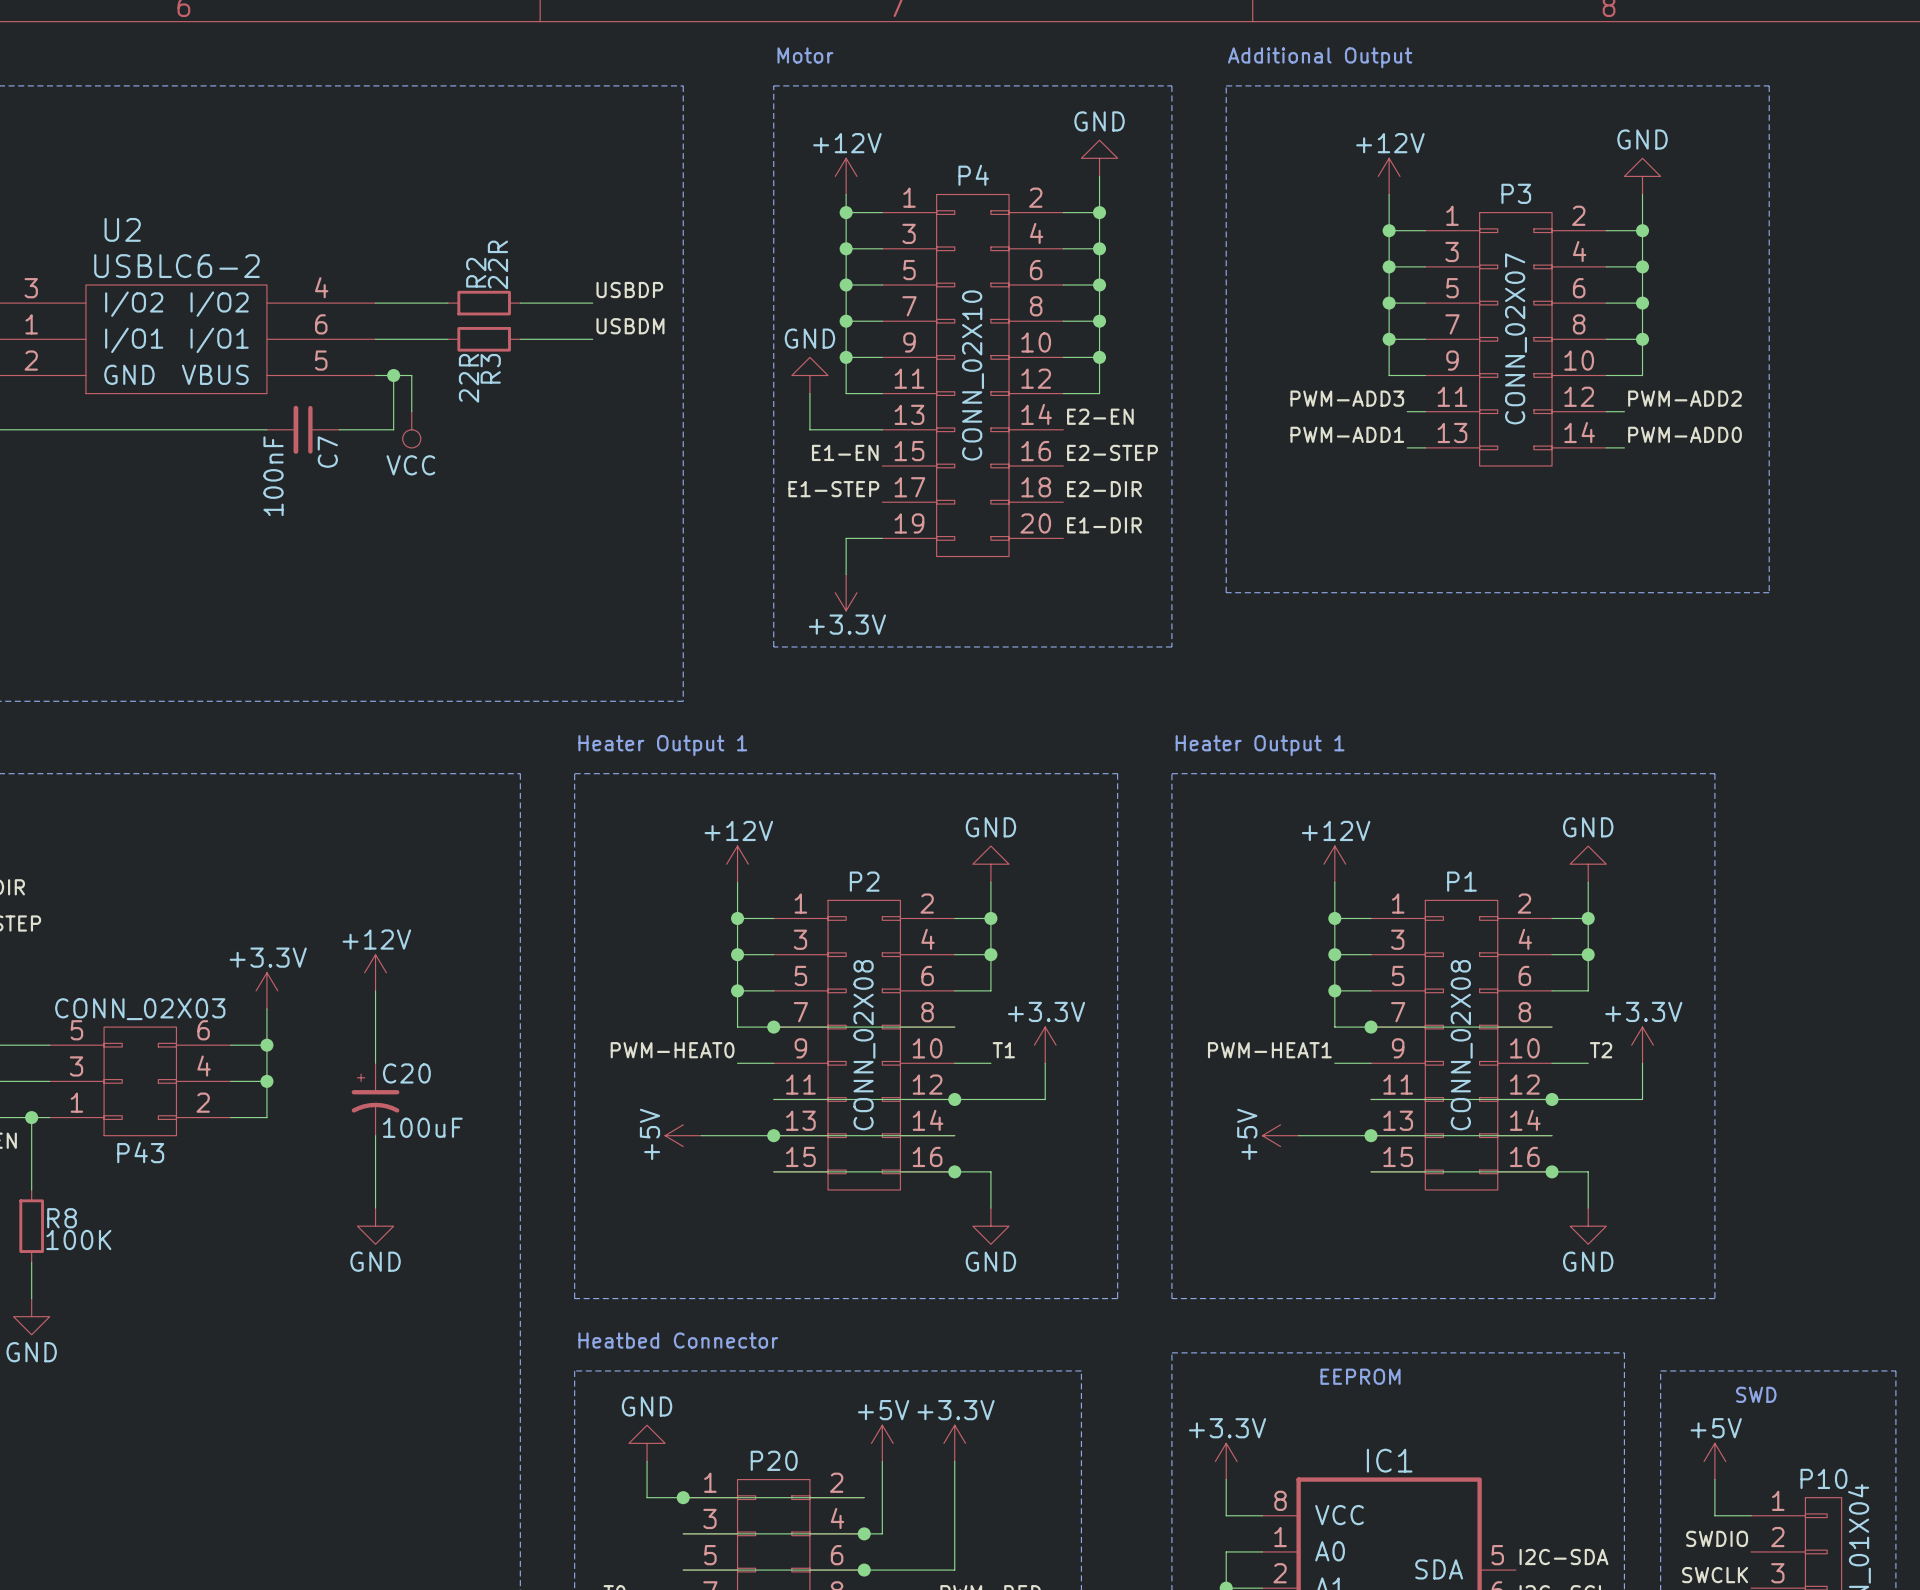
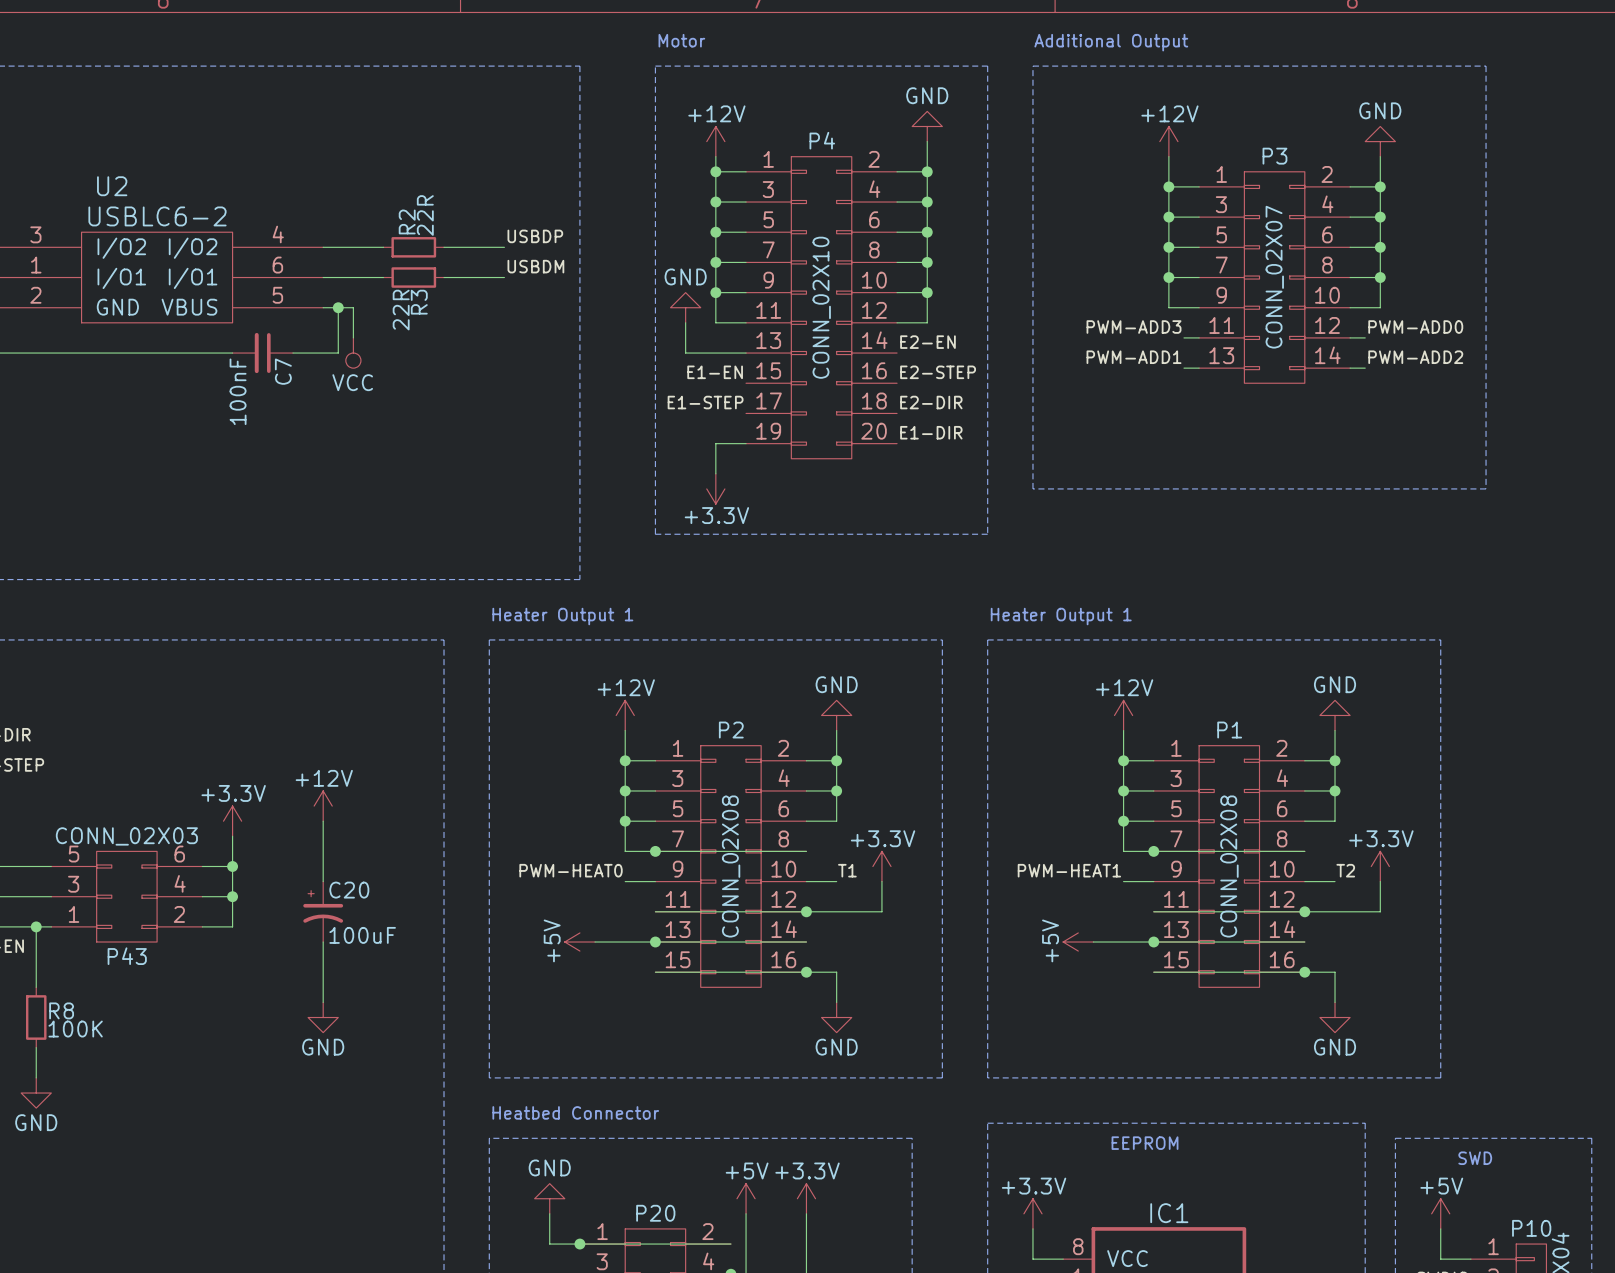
label: PWM-ADD2 (1685, 398) -> PWM-ADD0 (1415, 327)
label: PWM-ADD0 (1685, 434) -> PWM-ADD2 (1415, 357)

